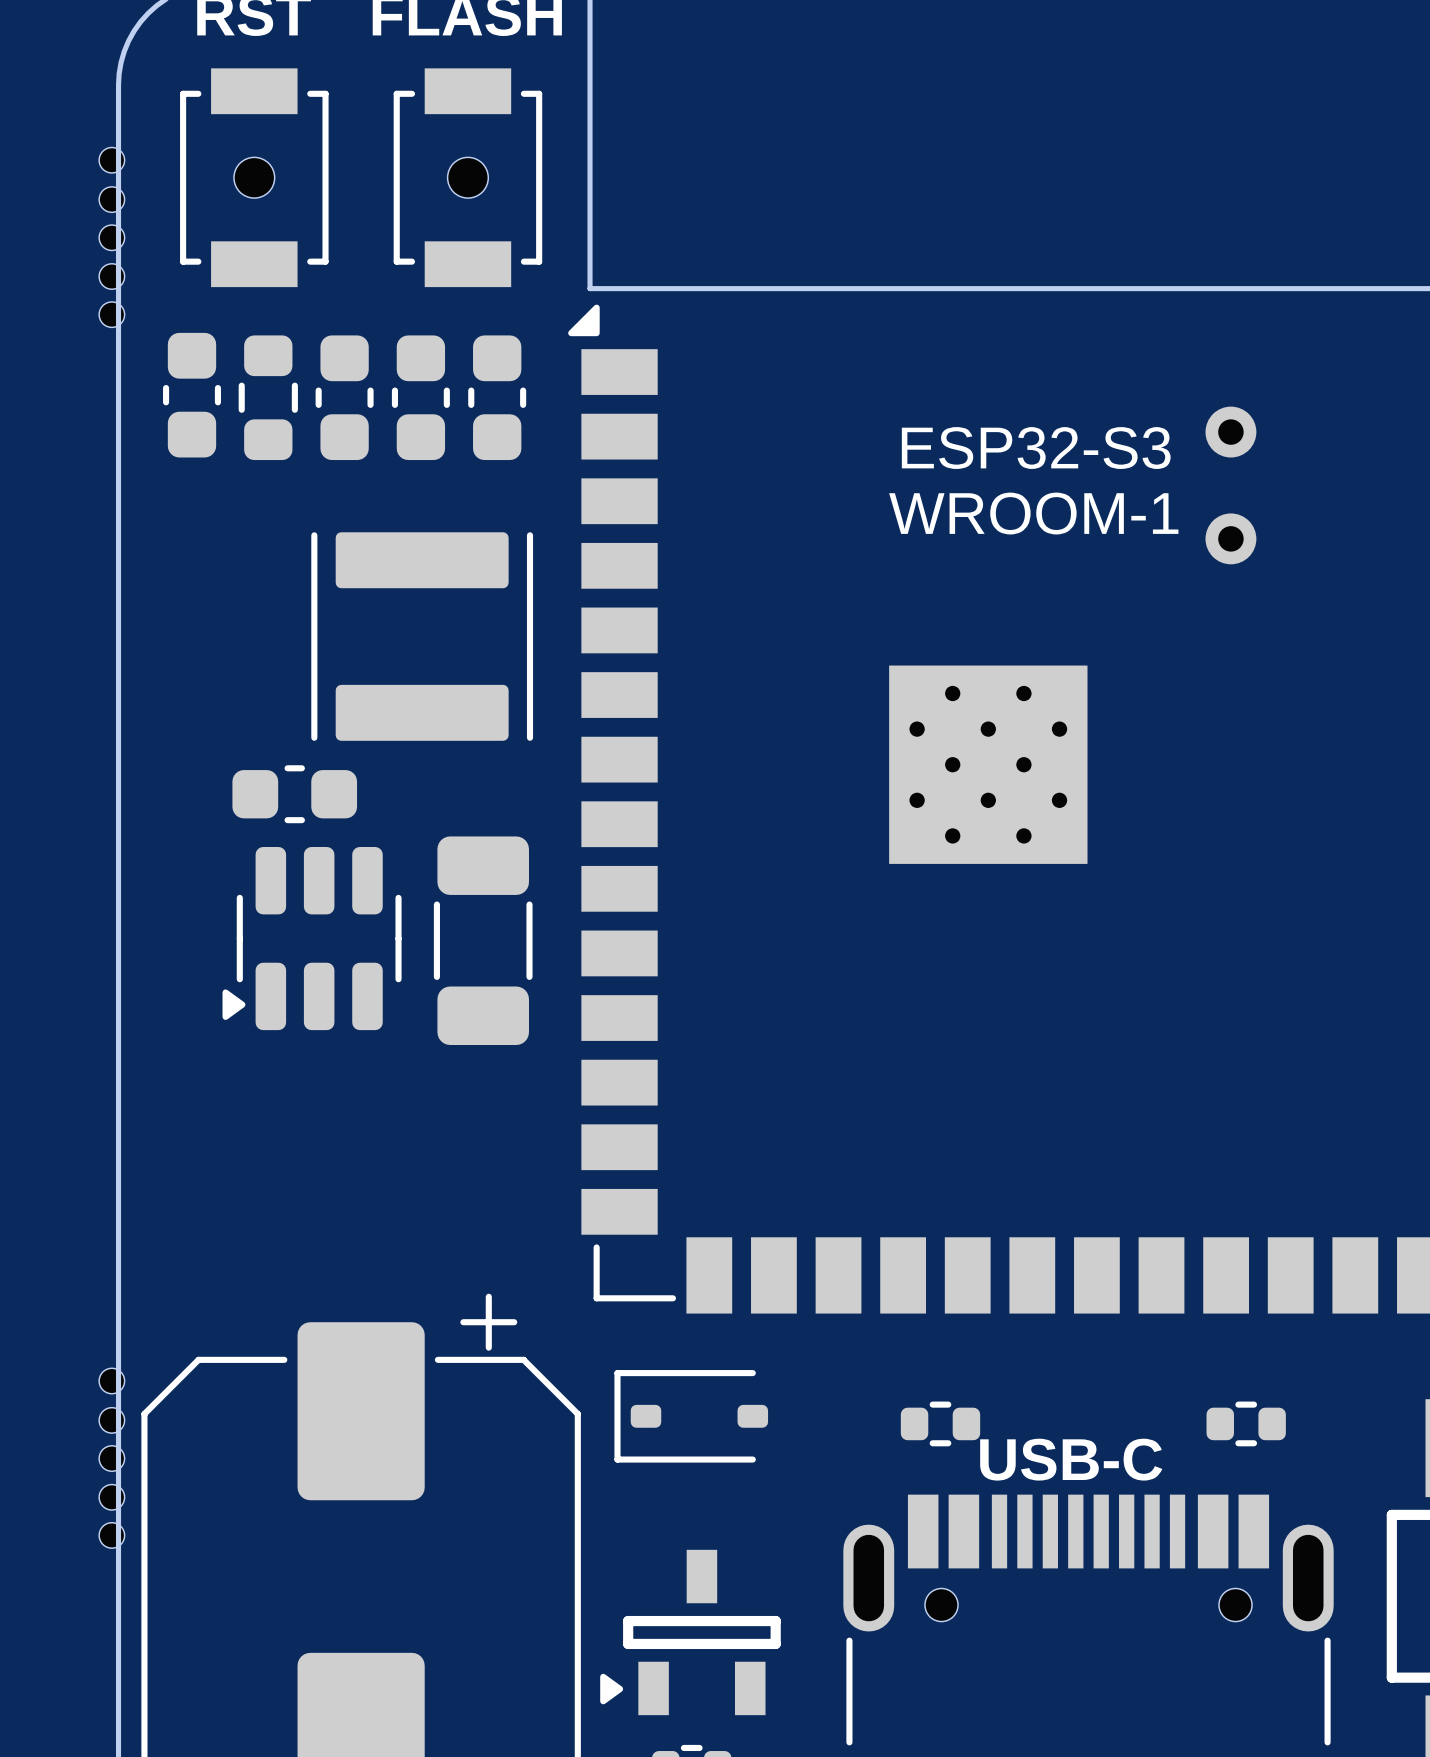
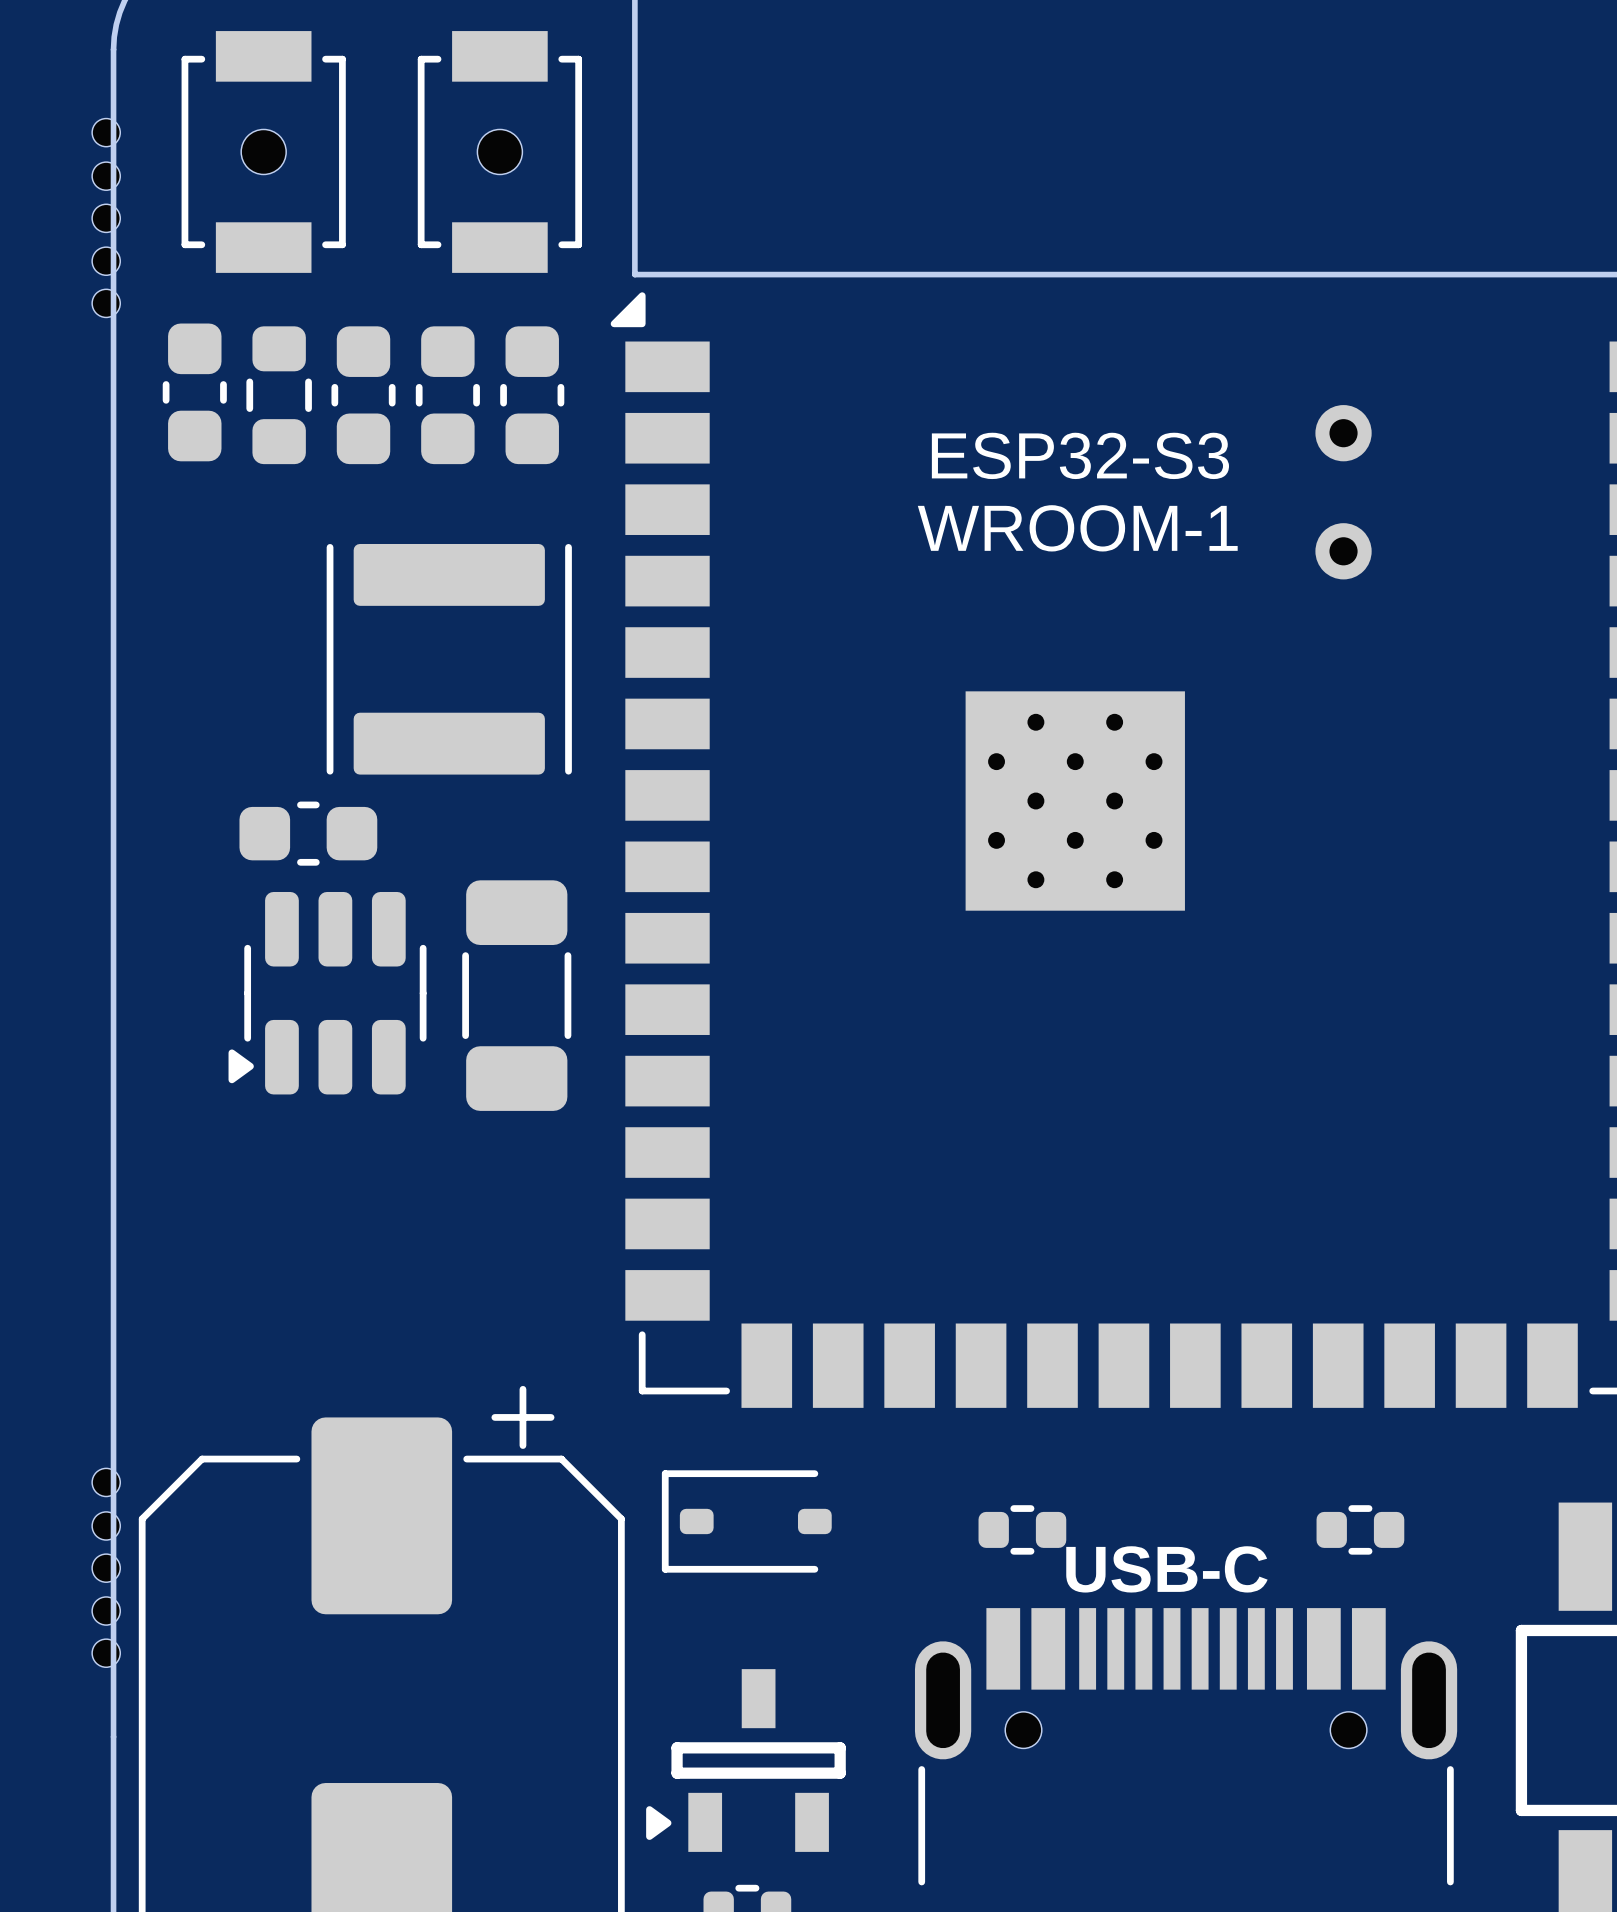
text position: ESP32-S3 (1036, 448) -> ESP32-S3 (1080, 455)
text position: WROOM-1 (1033, 513) -> WROOM-1 (1077, 528)

